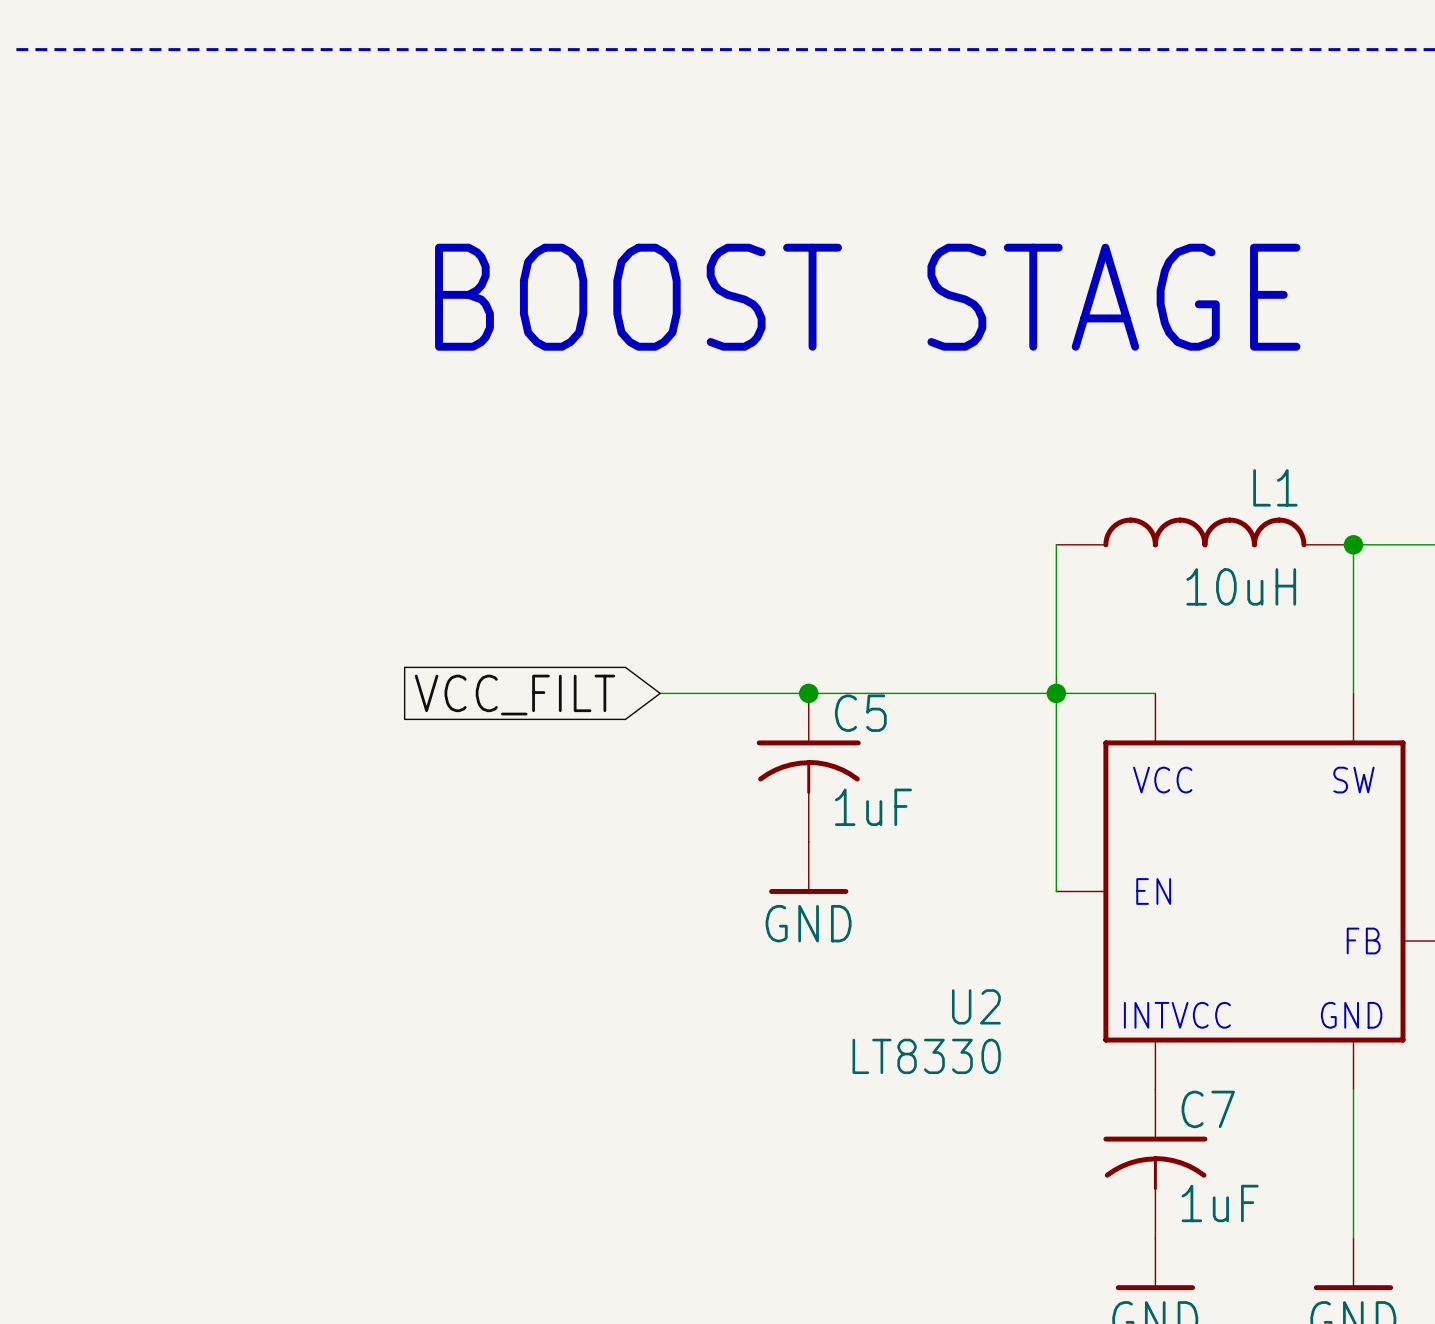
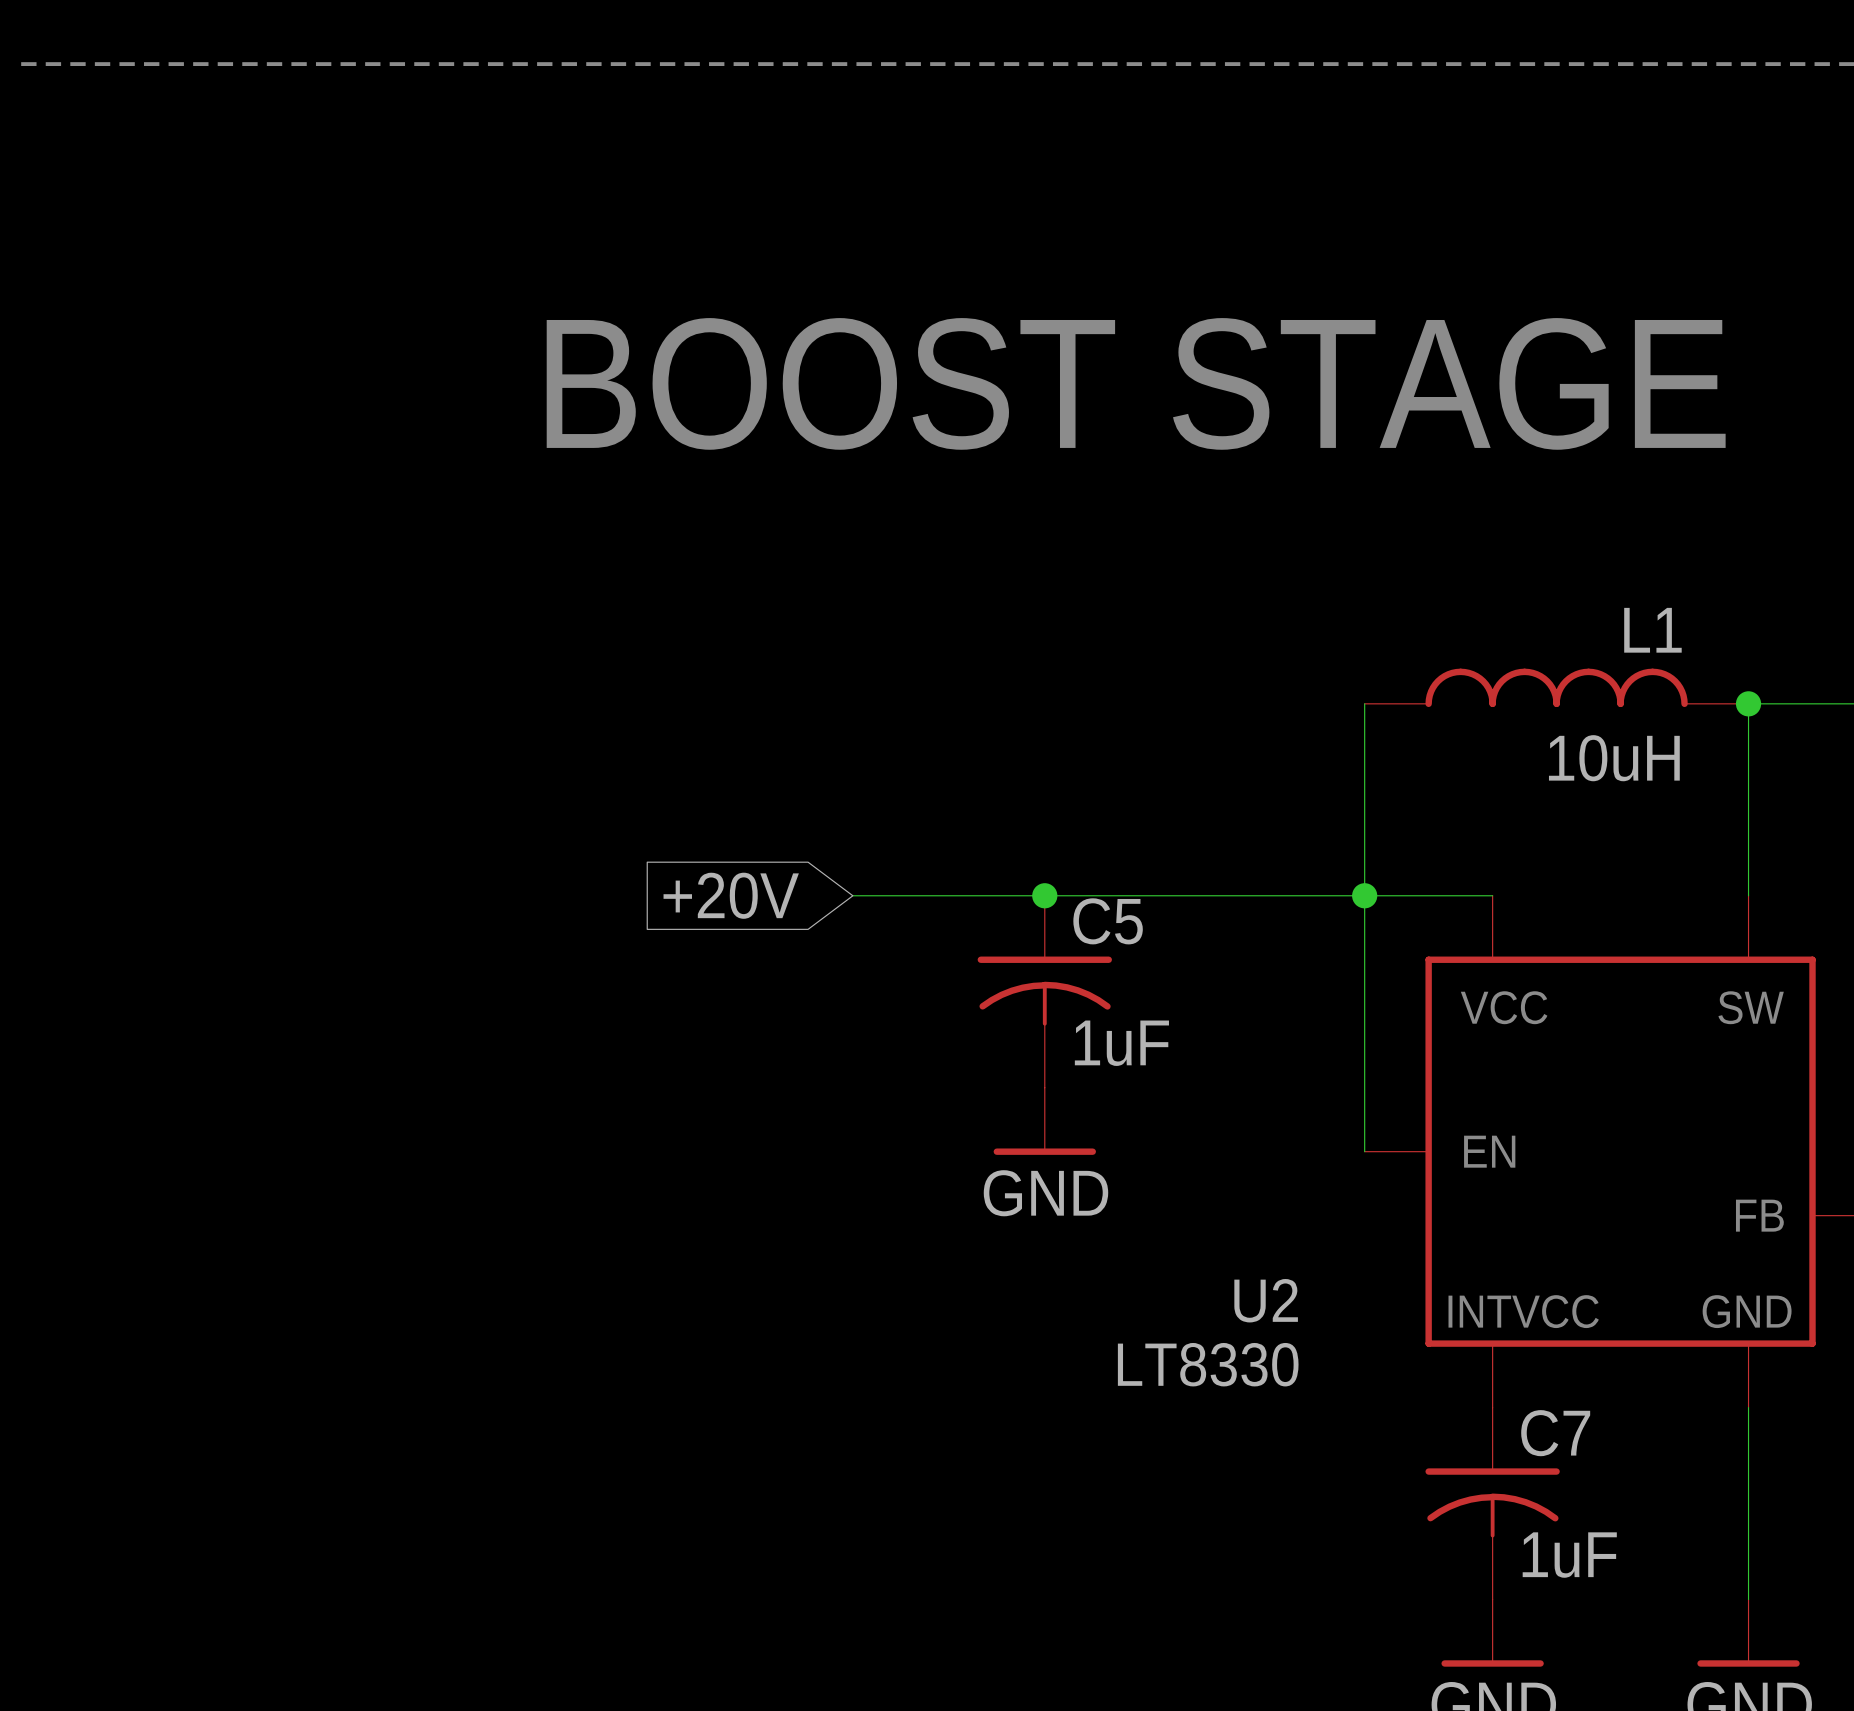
global label: VCC_FILT (514, 695) -> +20V (731, 895)

